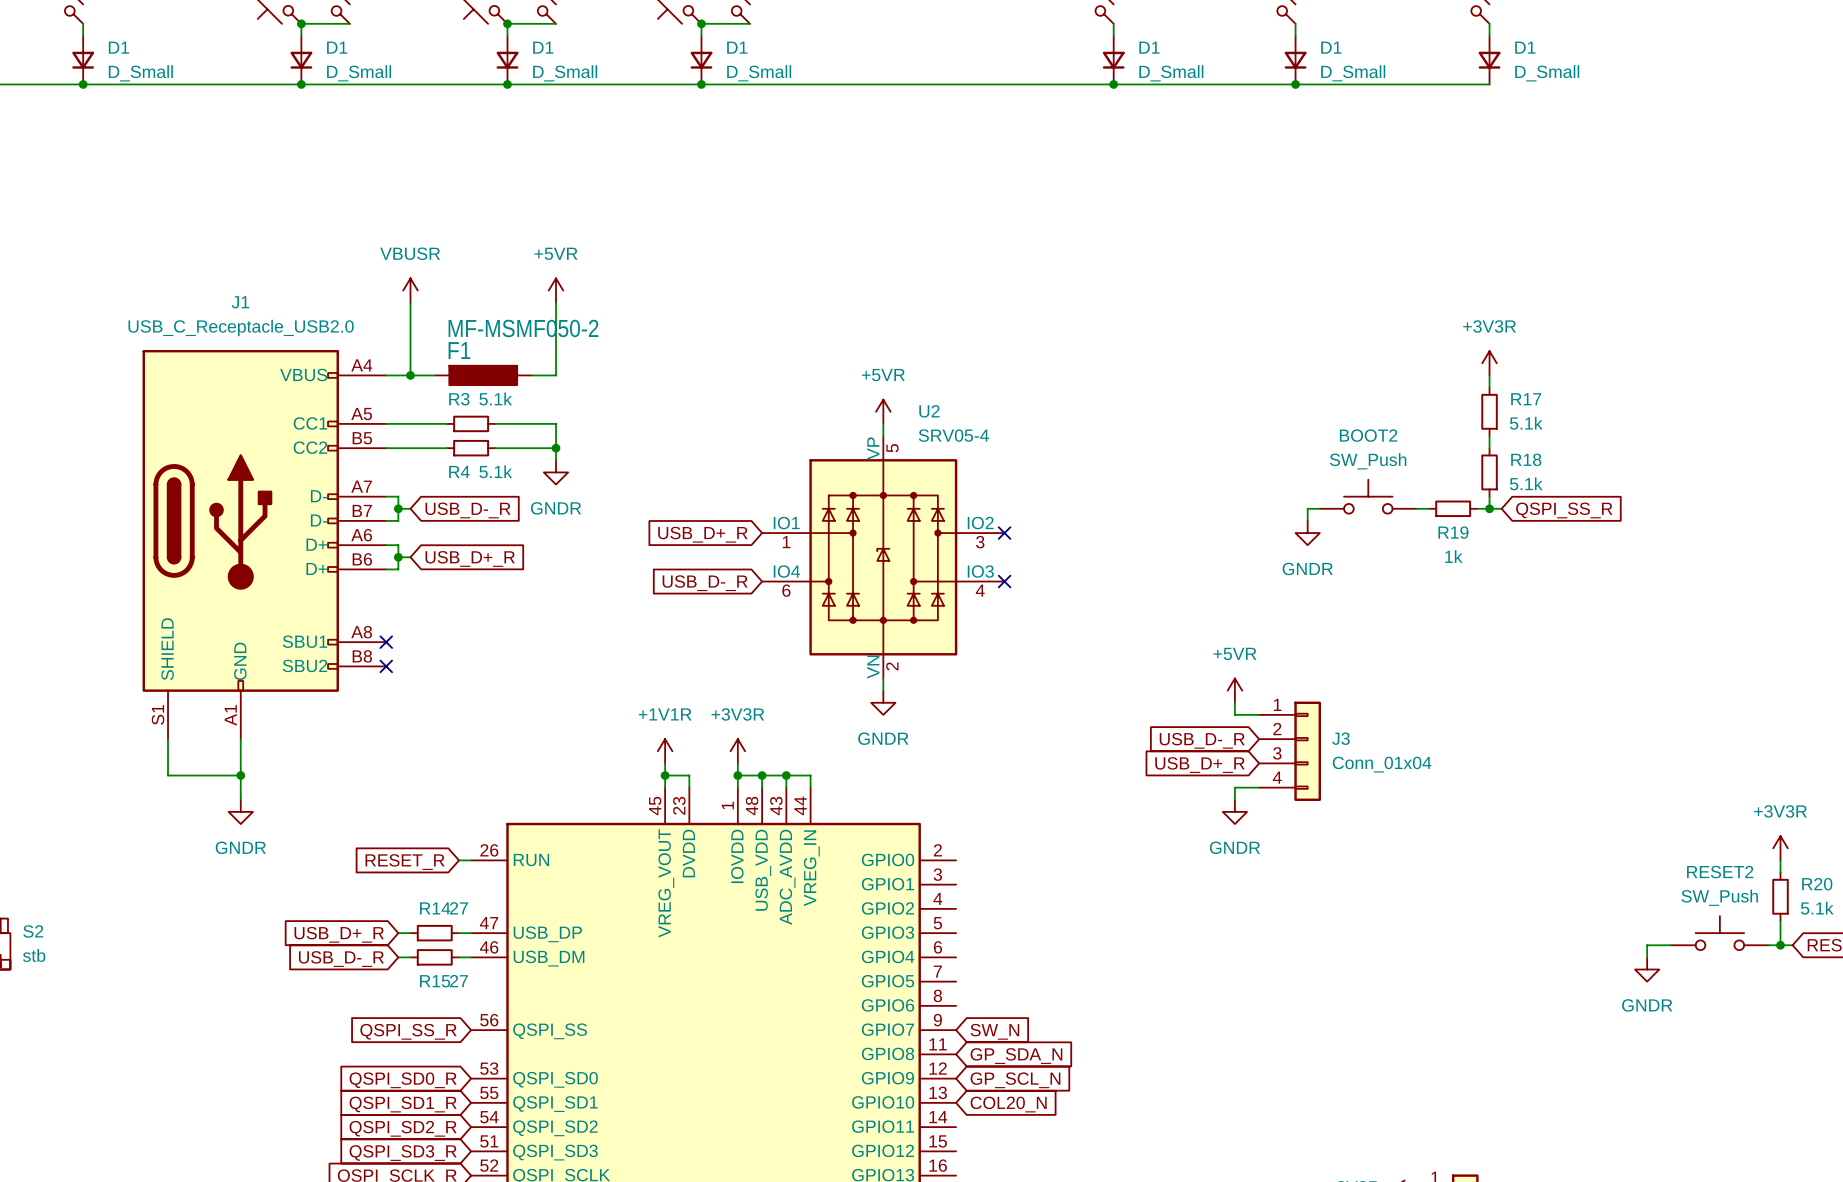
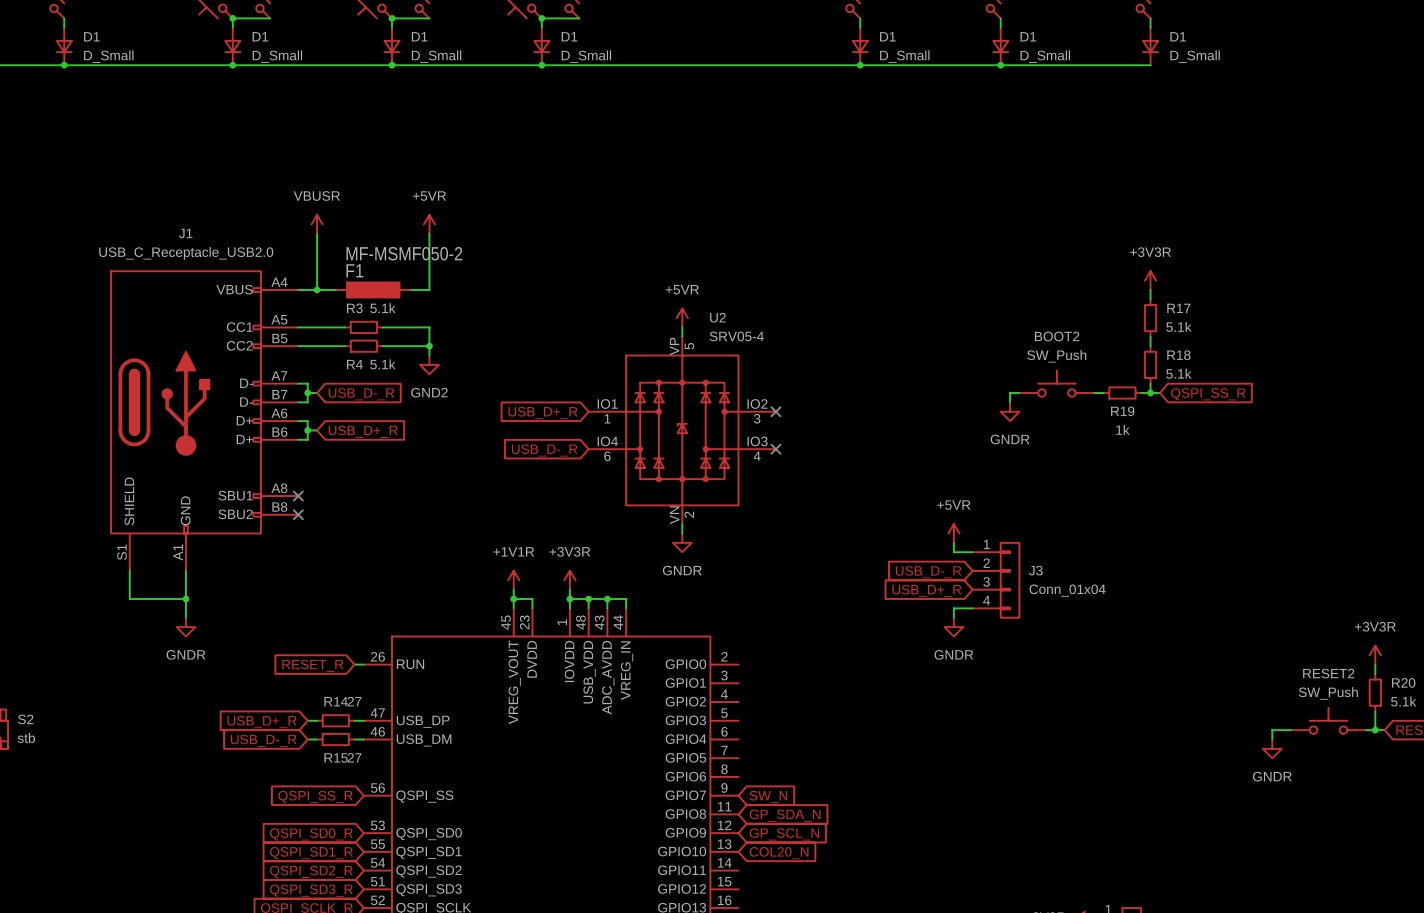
power symbol: GNDR (555, 472) -> GND2 (429, 364)

